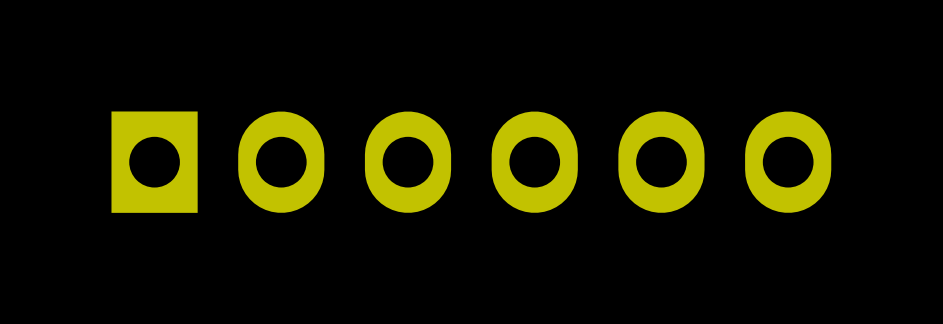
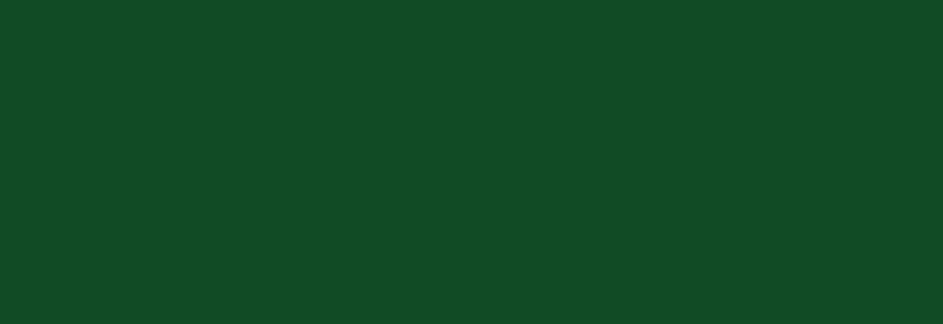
part: (471, 162) -> none

